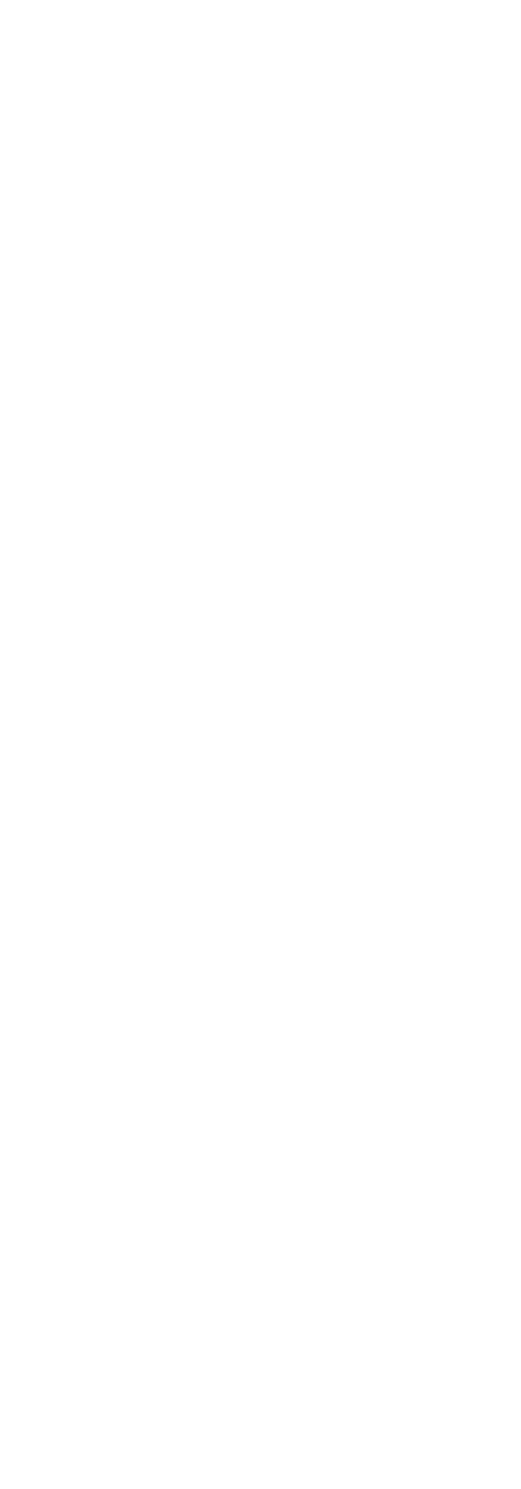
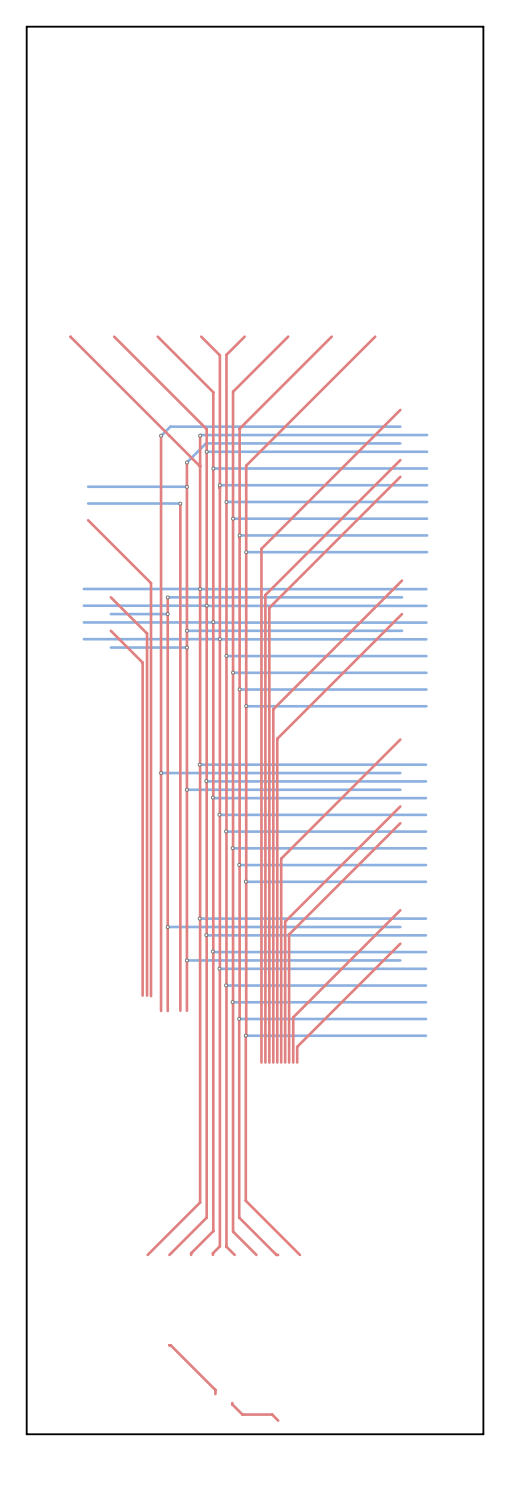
board edge: none -> (26, 26) (483, 26) (483, 1434) (26, 1434) (26, 26)
top track: none -> (70, 336) (200, 466)
top track: none -> (114, 336) (206, 429) (206, 1217) (169, 1254)
top track: none -> (157, 336) (213, 392) (213, 1231) (191, 1254)
top track: none -> (201, 336) (219, 355) (219, 1246) (212, 1254)
top track: none -> (244, 336) (226, 354) (226, 1246) (234, 1254)
top track: none -> (288, 336) (233, 391) (233, 1231) (256, 1254)
top track: none -> (331, 336) (239, 428) (239, 1217) (278, 1254)
top track: none -> (375, 336) (246, 465) (245, 1200) (299, 1254)
top track: none -> (400, 409) (261, 548) (261, 1062)
bottom track: none -> (400, 426) (170, 426) (161, 435)
top track: none -> (161, 435) (161, 1010)
via: none -> (161, 435)
top track: none -> (200, 435) (200, 1202) (147, 1254)
via: none -> (200, 435)
bottom track: none -> (427, 435) (200, 435)
bottom track: none -> (400, 443) (206, 443) (186, 462)
bottom track: none -> (206, 451) (427, 451)
via: none -> (206, 451)
top track: none -> (400, 460) (265, 595) (265, 1062)
top track: none -> (186, 462) (186, 1010)
via: none -> (186, 462)
bottom track: none -> (213, 468) (427, 468)
via: none -> (213, 468)
top track: none -> (400, 476) (269, 607) (269, 1062)
bottom track: none -> (219, 485) (427, 485)
via: none -> (219, 485)
bottom track: none -> (88, 486) (186, 486)
via: none -> (186, 486)
bottom track: none -> (226, 501) (427, 501)
via: none -> (226, 501)
bottom track: none -> (88, 503) (180, 503)
top track: none -> (180, 503) (180, 1010)
via: none -> (180, 503)
bottom track: none -> (233, 518) (427, 518)
via: none -> (233, 518)
top track: none -> (88, 520) (151, 583) (151, 996)
bottom track: none -> (239, 535) (427, 535)
via: none -> (239, 535)
bottom track: none -> (246, 552) (427, 552)
via: none -> (246, 552)
top track: none -> (401, 580) (273, 709) (273, 1062)
bottom track: none -> (83, 588) (426, 589)
via: none -> (200, 589)
top track: none -> (110, 597) (147, 633) (147, 995)
top track: none -> (167, 597) (167, 1010)
bottom track: none -> (167, 597) (401, 597)
via: none -> (167, 597)
bottom track: none -> (83, 605) (426, 605)
via: none -> (206, 605)
bottom track: none -> (110, 614) (167, 614)
via: none -> (167, 614)
top track: none -> (401, 614) (277, 738) (277, 1062)
bottom track: none -> (83, 622) (426, 622)
via: none -> (213, 622)
top track: none -> (110, 630) (142, 662) (142, 995)
bottom track: none -> (186, 630) (401, 630)
via: none -> (186, 630)
bottom track: none -> (83, 639) (426, 639)
via: none -> (219, 639)
bottom track: none -> (110, 647) (186, 647)
via: none -> (186, 647)
bottom track: none -> (226, 655) (426, 656)
via: none -> (226, 655)
bottom track: none -> (233, 672) (426, 672)
via: none -> (233, 672)
bottom track: none -> (239, 689) (426, 689)
via: none -> (239, 689)
bottom track: none -> (246, 706) (426, 706)
via: none -> (246, 706)
top track: none -> (400, 739) (281, 858) (281, 1062)
bottom track: none -> (199, 764) (425, 764)
via: none -> (199, 764)
bottom track: none -> (161, 773) (400, 773)
via: none -> (161, 773)
bottom track: none -> (206, 781) (425, 781)
via: none -> (206, 781)
bottom track: none -> (186, 789) (400, 789)
via: none -> (186, 789)
via: none -> (212, 797)
bottom track: none -> (213, 798) (425, 798)
top track: none -> (400, 806) (285, 921) (285, 1062)
bottom track: none -> (219, 814) (425, 814)
via: none -> (219, 814)
top track: none -> (400, 823) (289, 934) (289, 1062)
bottom track: none -> (226, 831) (425, 831)
via: none -> (226, 831)
bottom track: none -> (232, 848) (425, 848)
via: none -> (232, 848)
via: none -> (239, 864)
bottom track: none -> (239, 865) (425, 865)
bottom track: none -> (245, 881) (425, 881)
via: none -> (245, 881)
top track: none -> (400, 910) (293, 1017) (293, 1062)
bottom track: none -> (199, 918) (425, 918)
via: none -> (199, 918)
bottom track: none -> (167, 926) (400, 926)
via: none -> (167, 926)
bottom track: none -> (206, 935) (425, 935)
via: none -> (206, 935)
top track: none -> (400, 943) (297, 1046) (297, 1062)
via: none -> (212, 951)
bottom track: none -> (213, 952) (425, 952)
bottom track: none -> (186, 960) (400, 960)
via: none -> (186, 960)
bottom track: none -> (219, 968) (425, 968)
via: none -> (219, 968)
bottom track: none -> (226, 985) (425, 985)
via: none -> (226, 985)
bottom track: none -> (232, 1002) (425, 1002)
via: none -> (232, 1002)
via: none -> (239, 1018)
bottom track: none -> (239, 1019) (425, 1019)
bottom track: none -> (245, 1035) (425, 1035)
via: none -> (245, 1035)
top track: none -> (169, 1345) (215, 1390) (215, 1394)
top track: none -> (232, 1402) (242, 1414) (272, 1414) (278, 1420)

